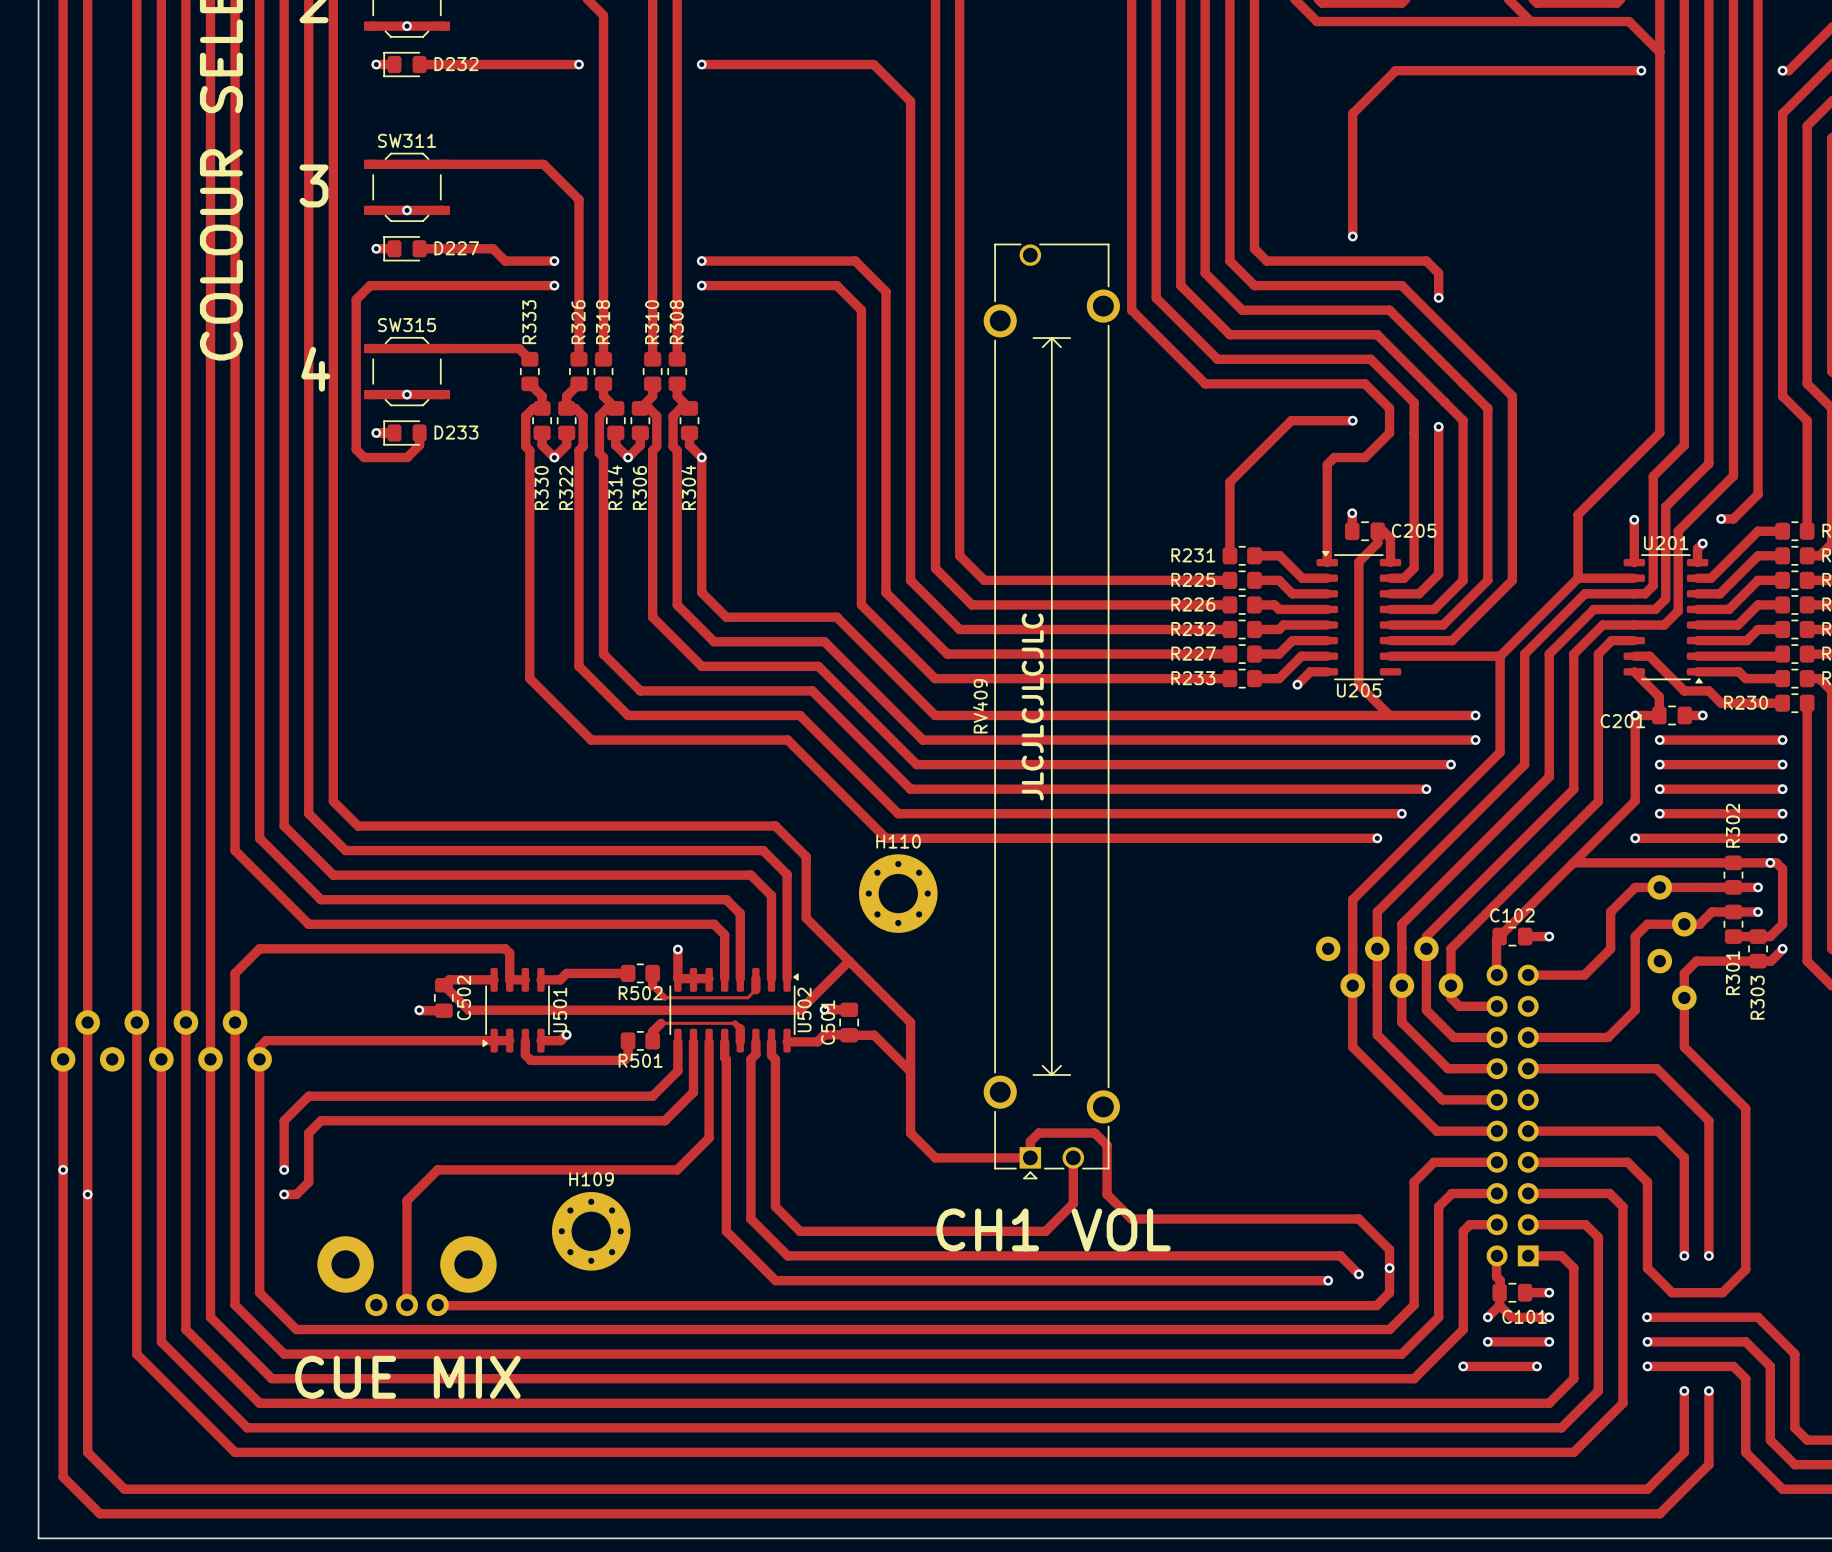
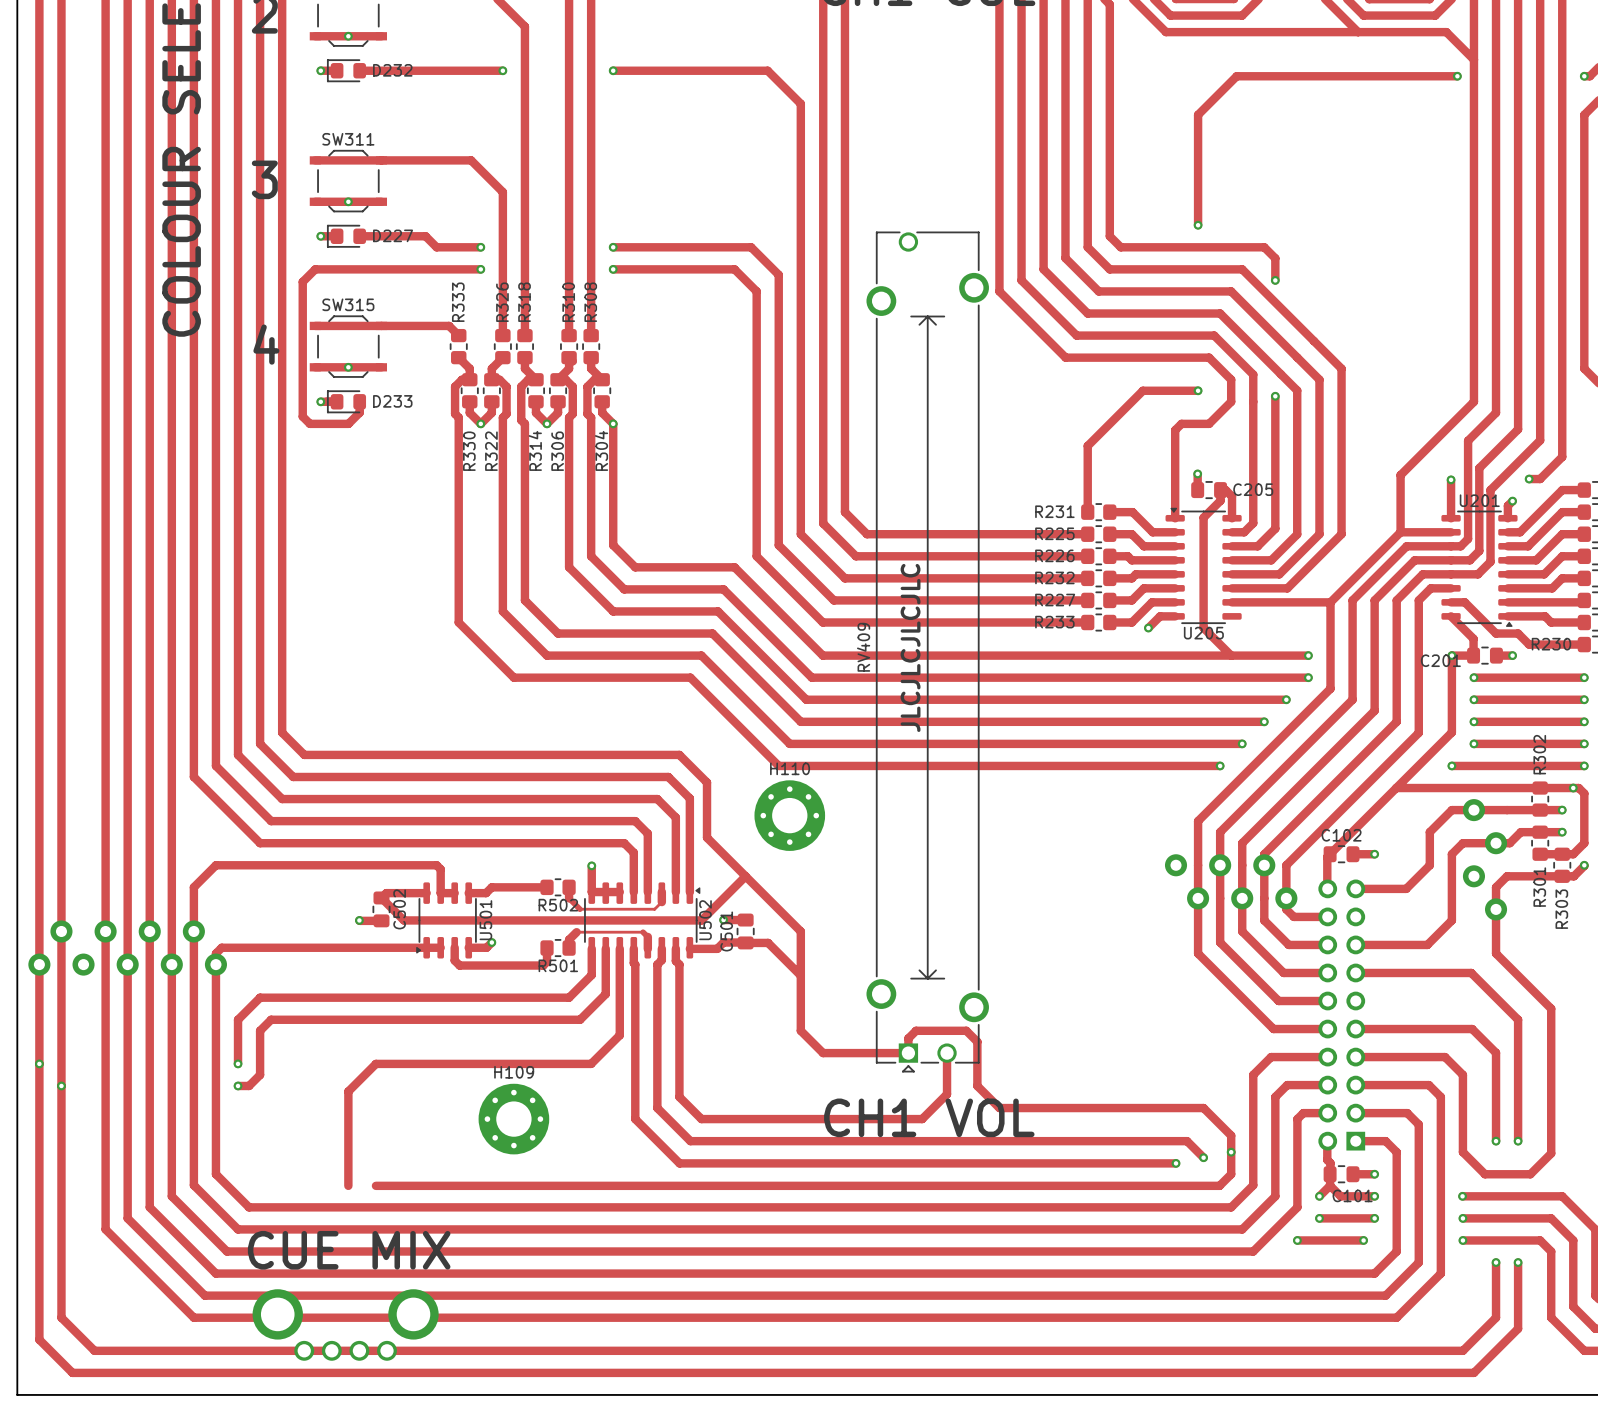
part: (407, 1276) -> none
part: none -> (345, 1324)

